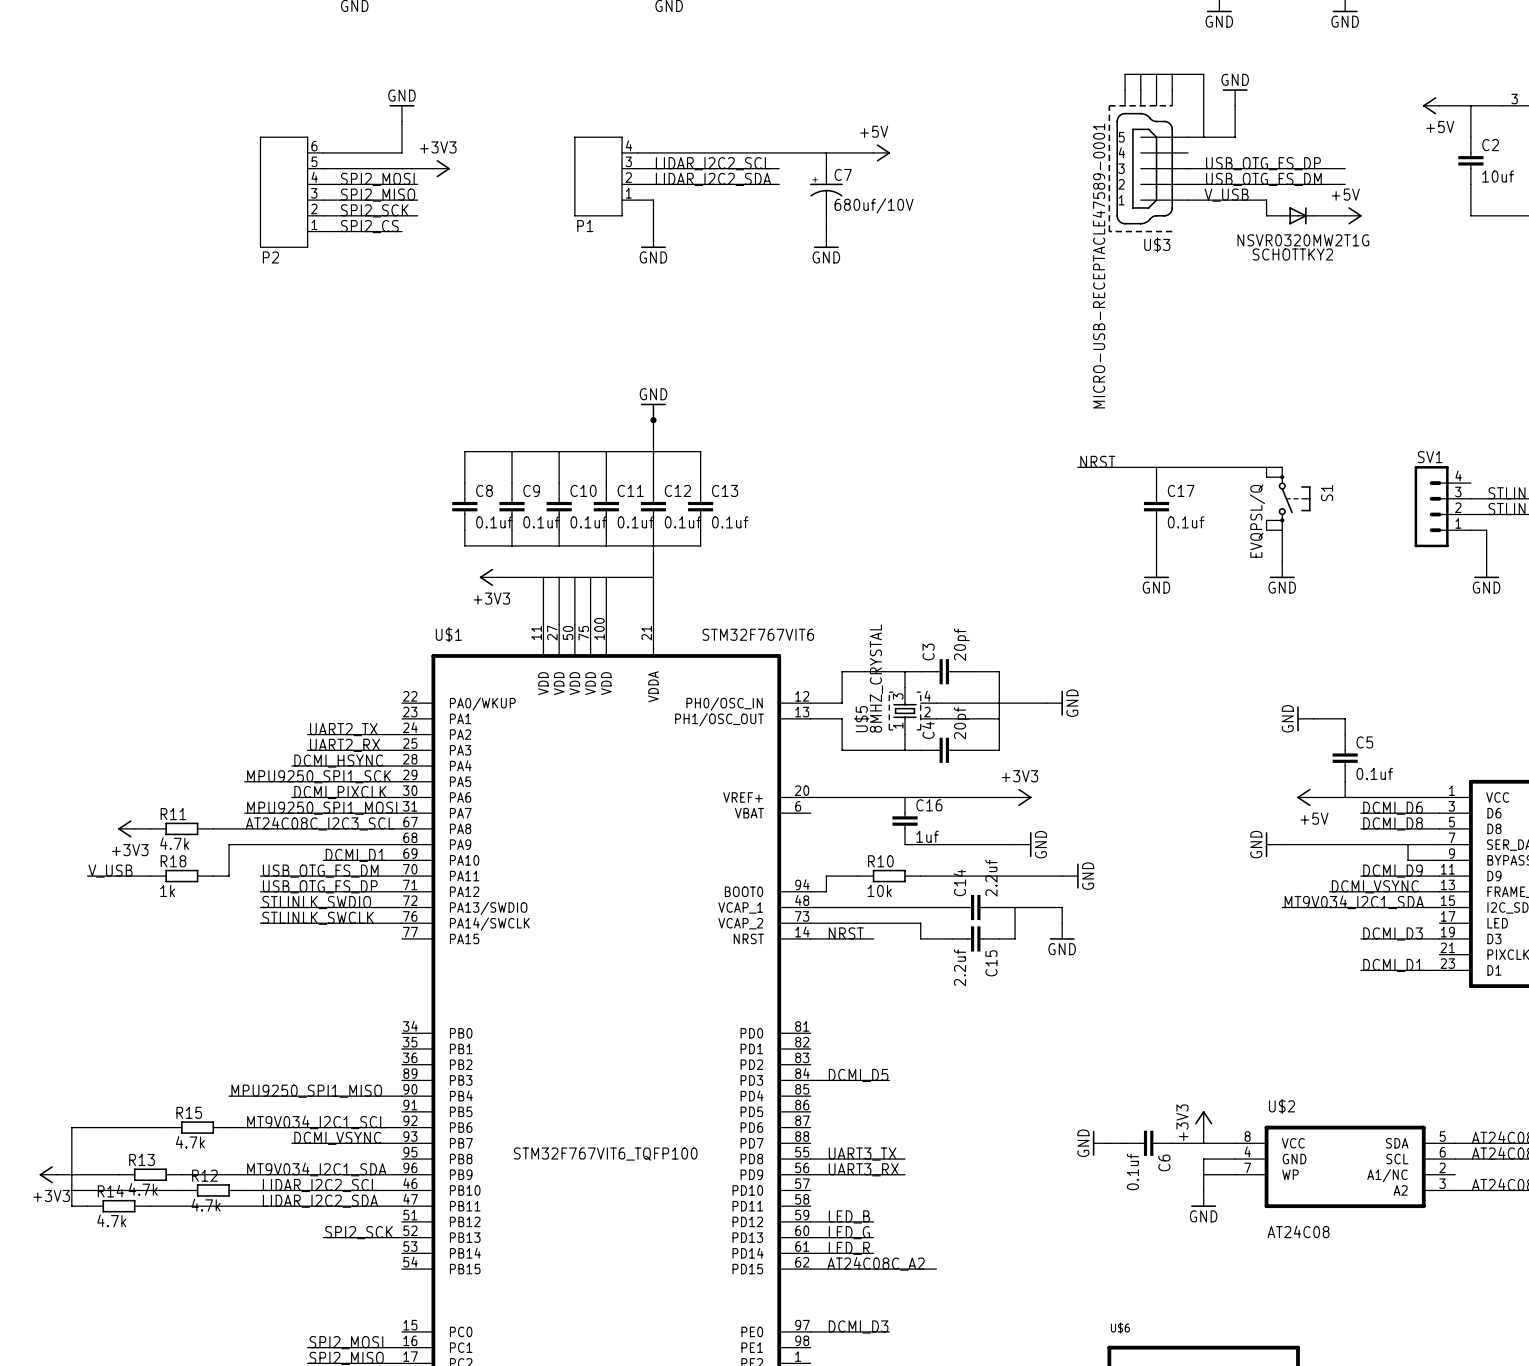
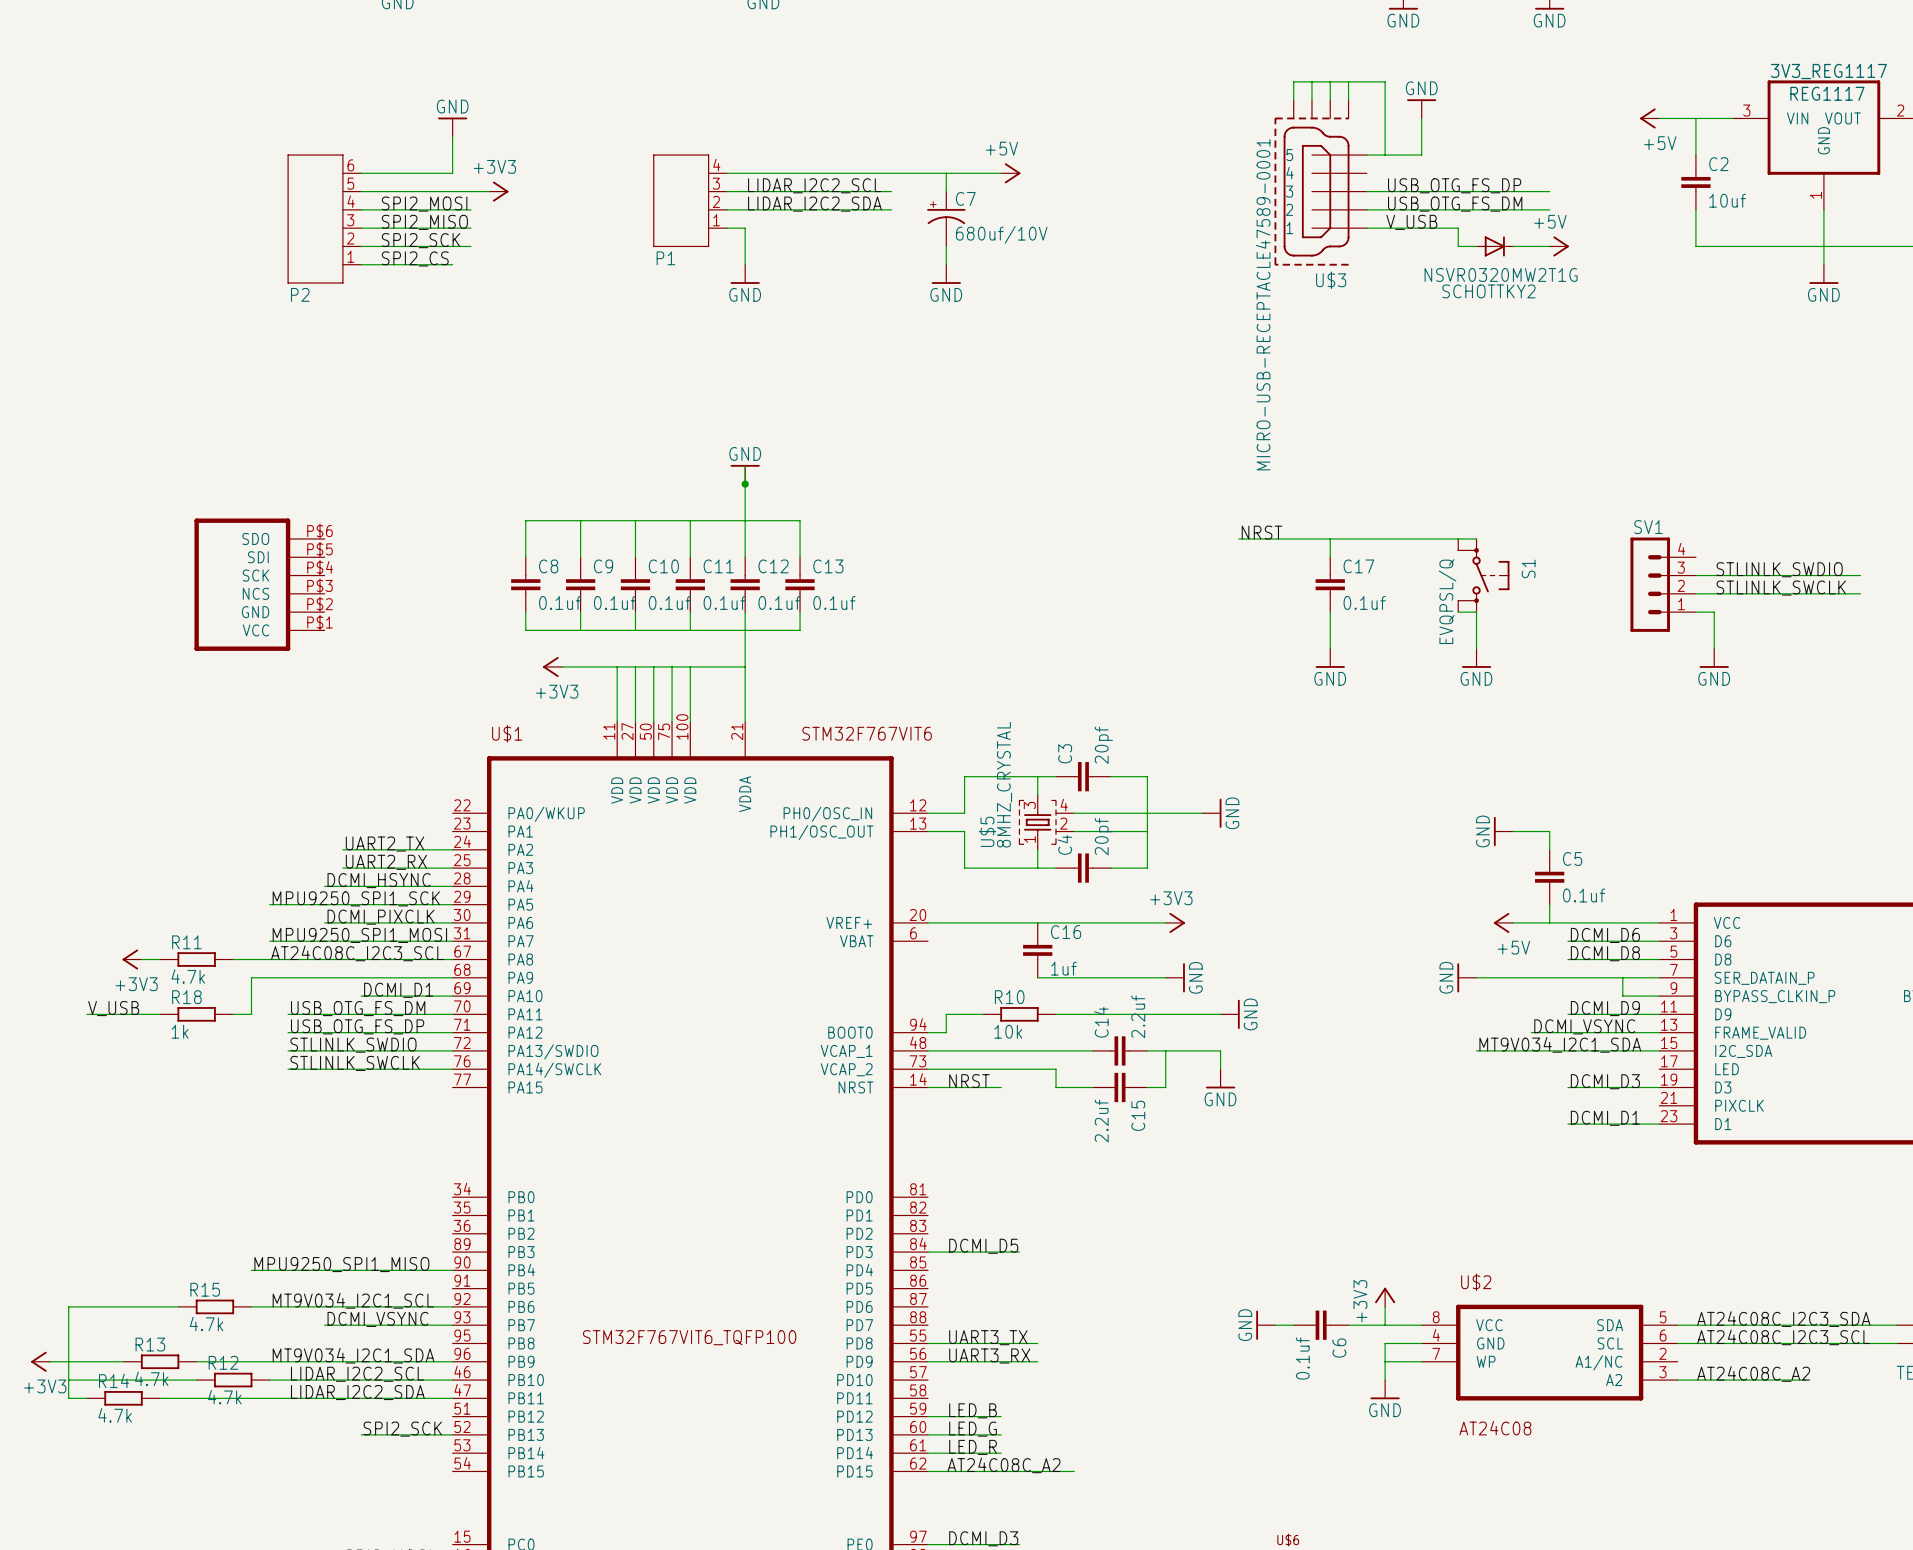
part: none -> (259, 584)

